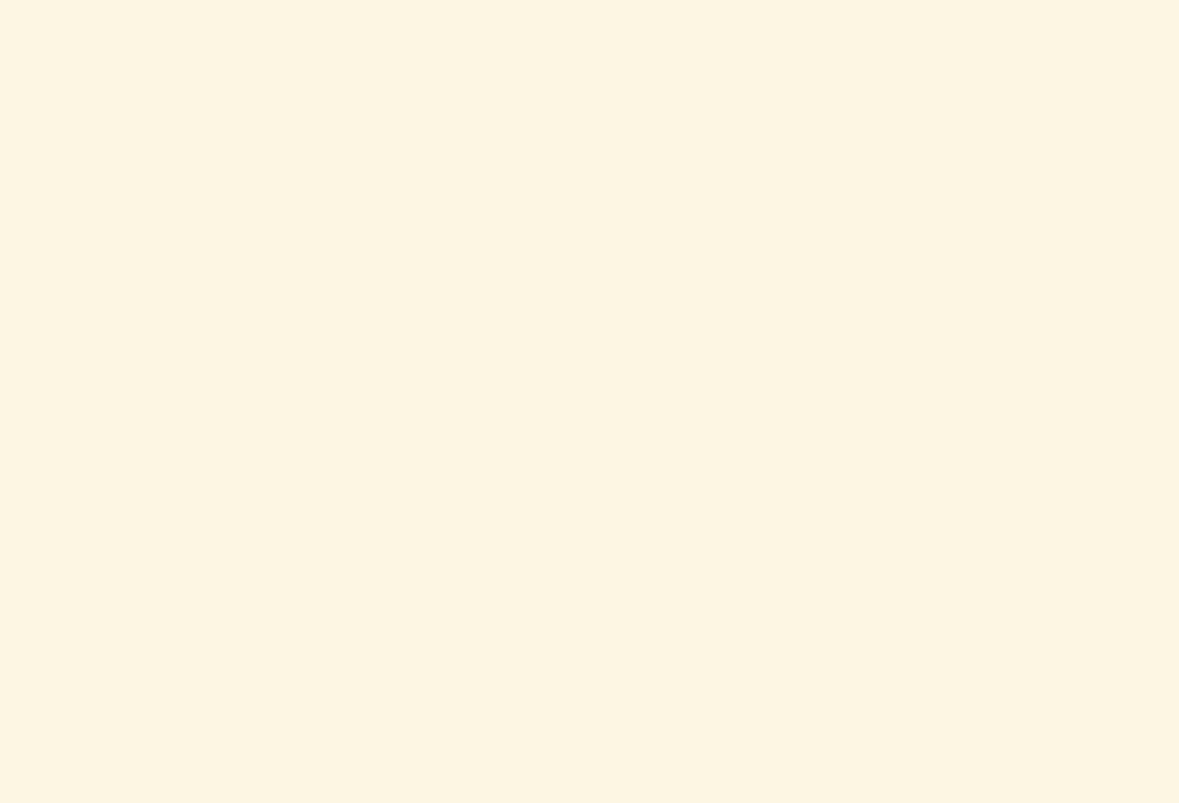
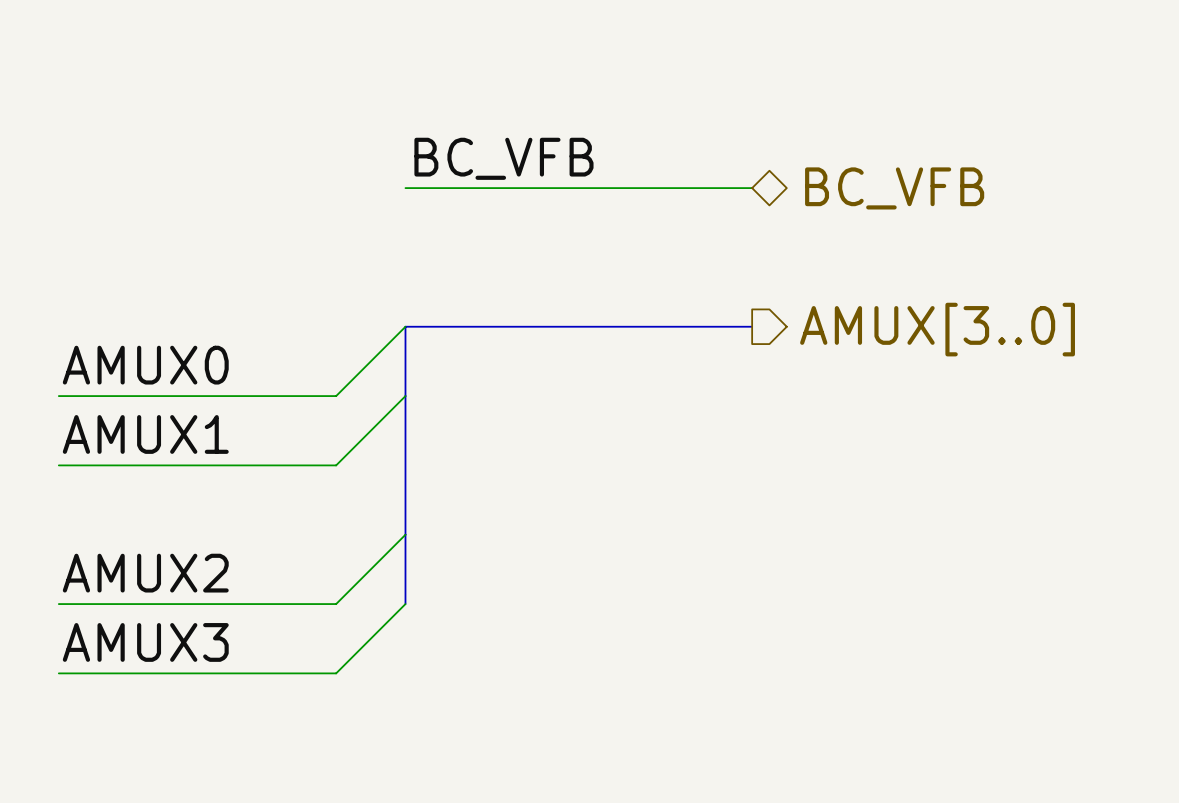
label: none -> BC_VFB (503, 158)
wire: none -> (405, 188) (752, 188)
hierarchical label: none -> BC_VFB (894, 188)
wire: none -> (405, 326) (336, 396) (58, 396)
bus: none -> (752, 326) (405, 326) (405, 604)
hierarchical label: none -> AMUX[3..0] (937, 329)
label: none -> AMUX0 (145, 365)
wire: none -> (405, 396) (336, 465) (58, 465)
label: none -> AMUX1 (145, 434)
wire: none -> (405, 534) (336, 604) (58, 604)
label: none -> AMUX2 (145, 573)
wire: none -> (405, 604) (336, 673) (58, 673)
label: none -> AMUX3 (145, 642)

